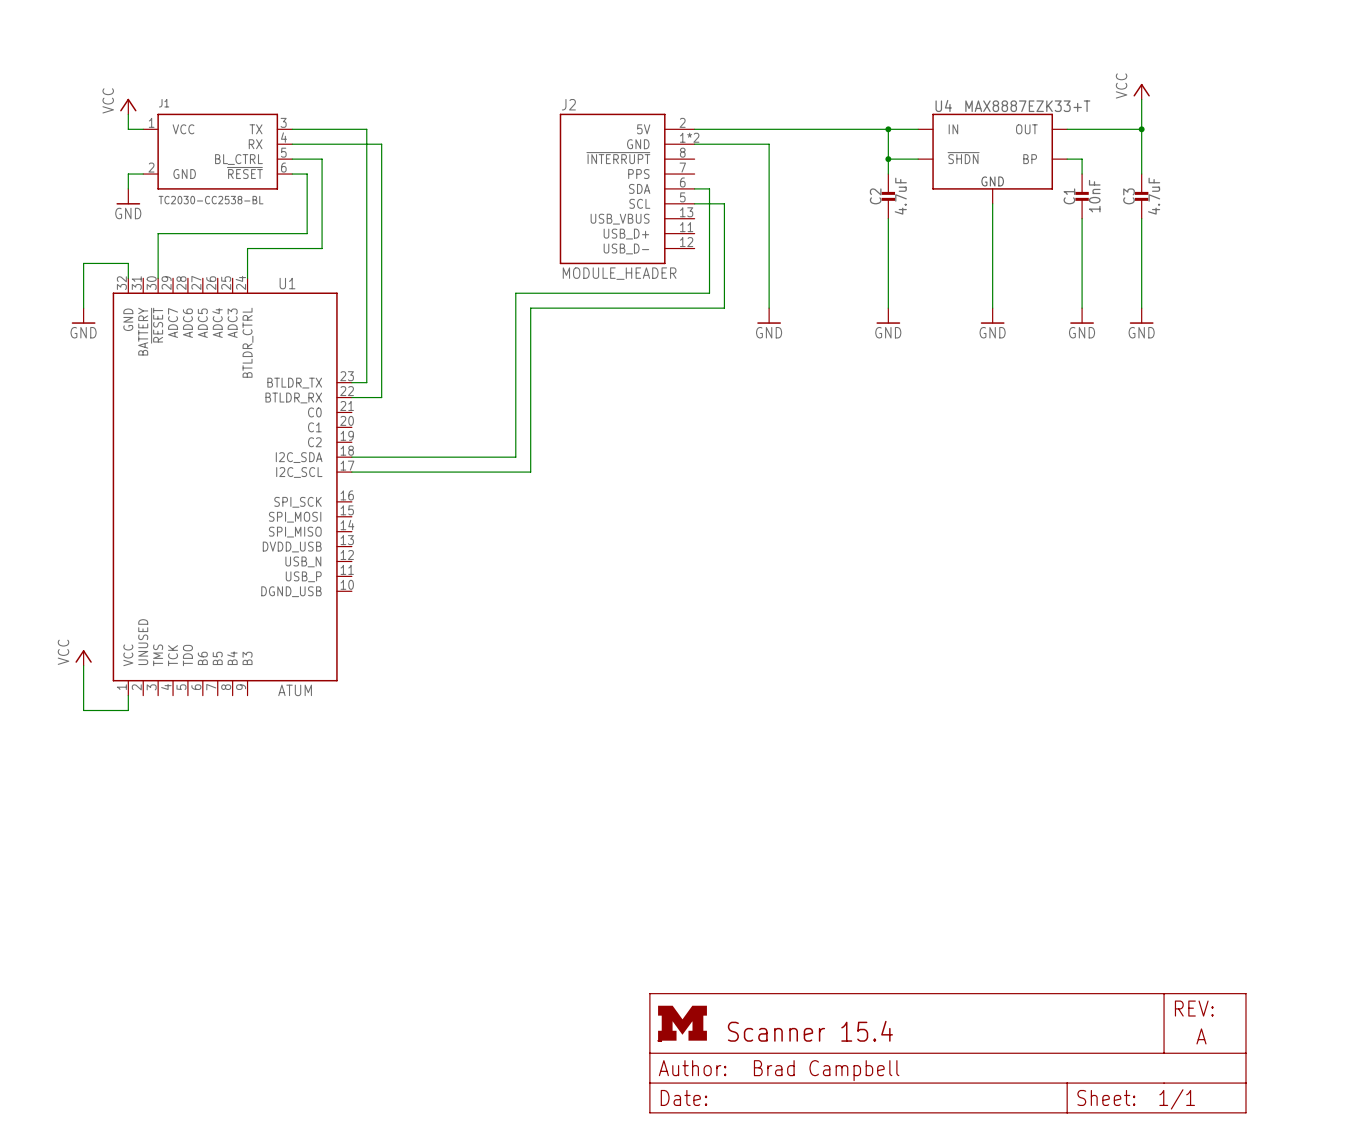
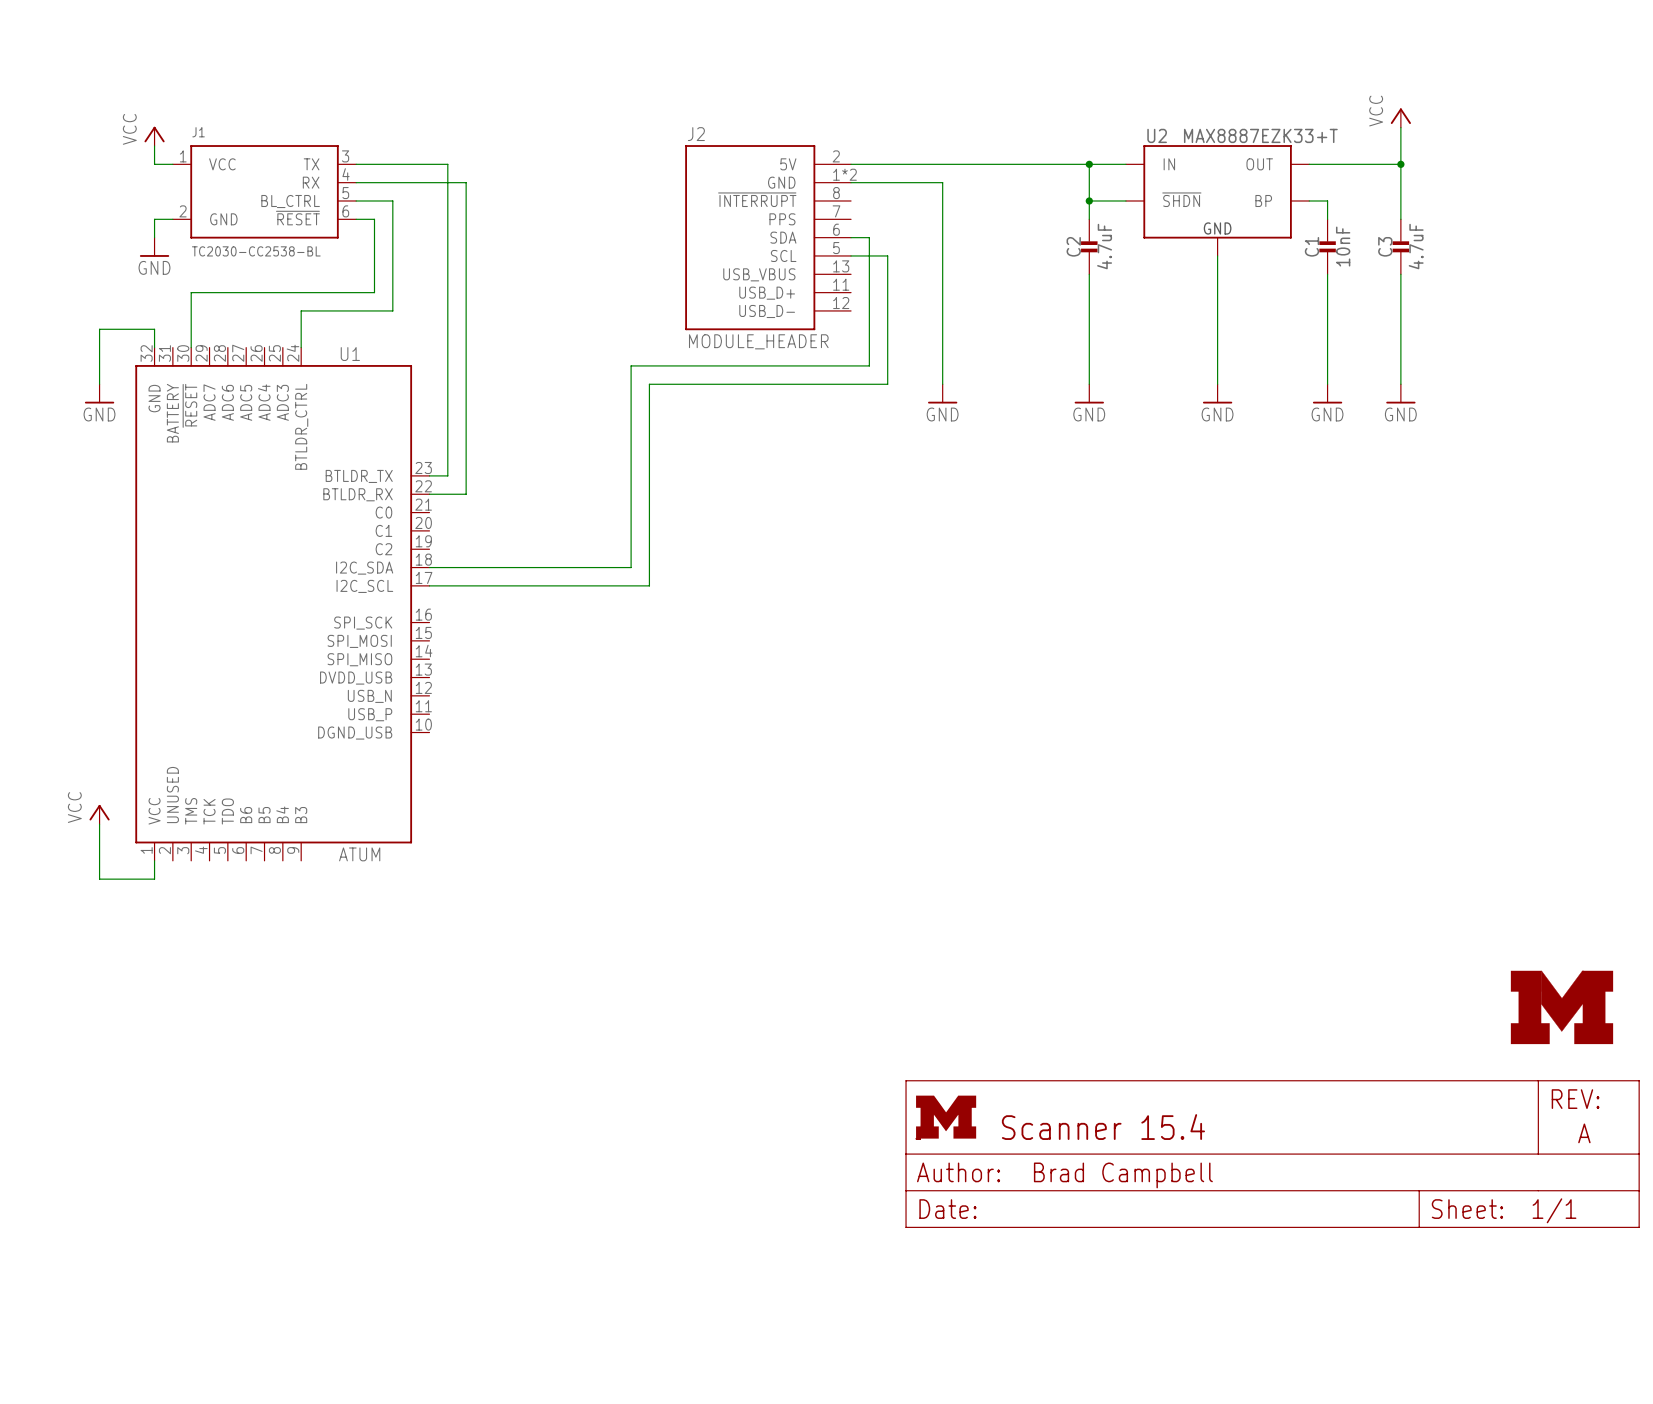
U4 name: U4 (943, 105) -> U2 (1157, 135)
part: none -> (1561, 1007)
part: none -> (1272, 1154)
part: (947, 1053) -> none

